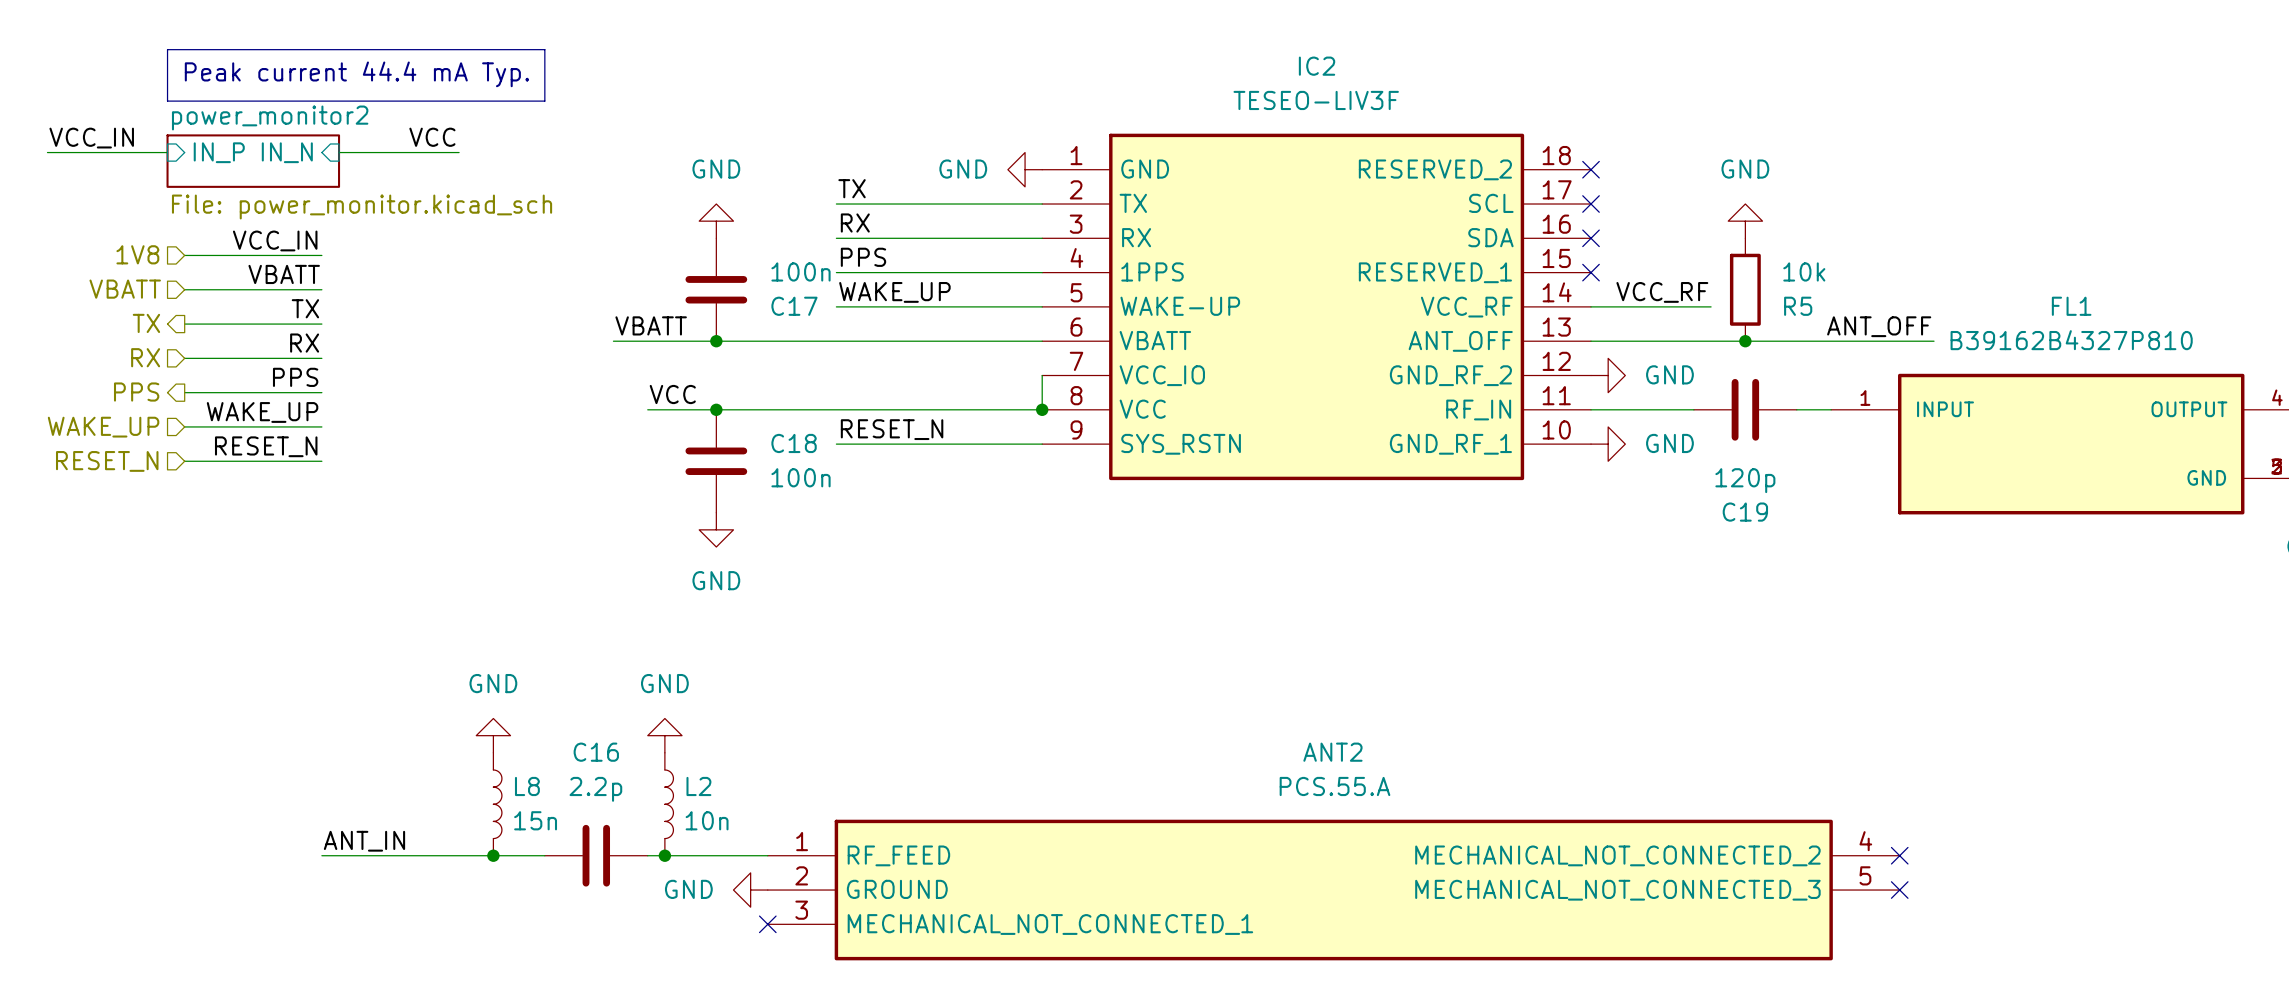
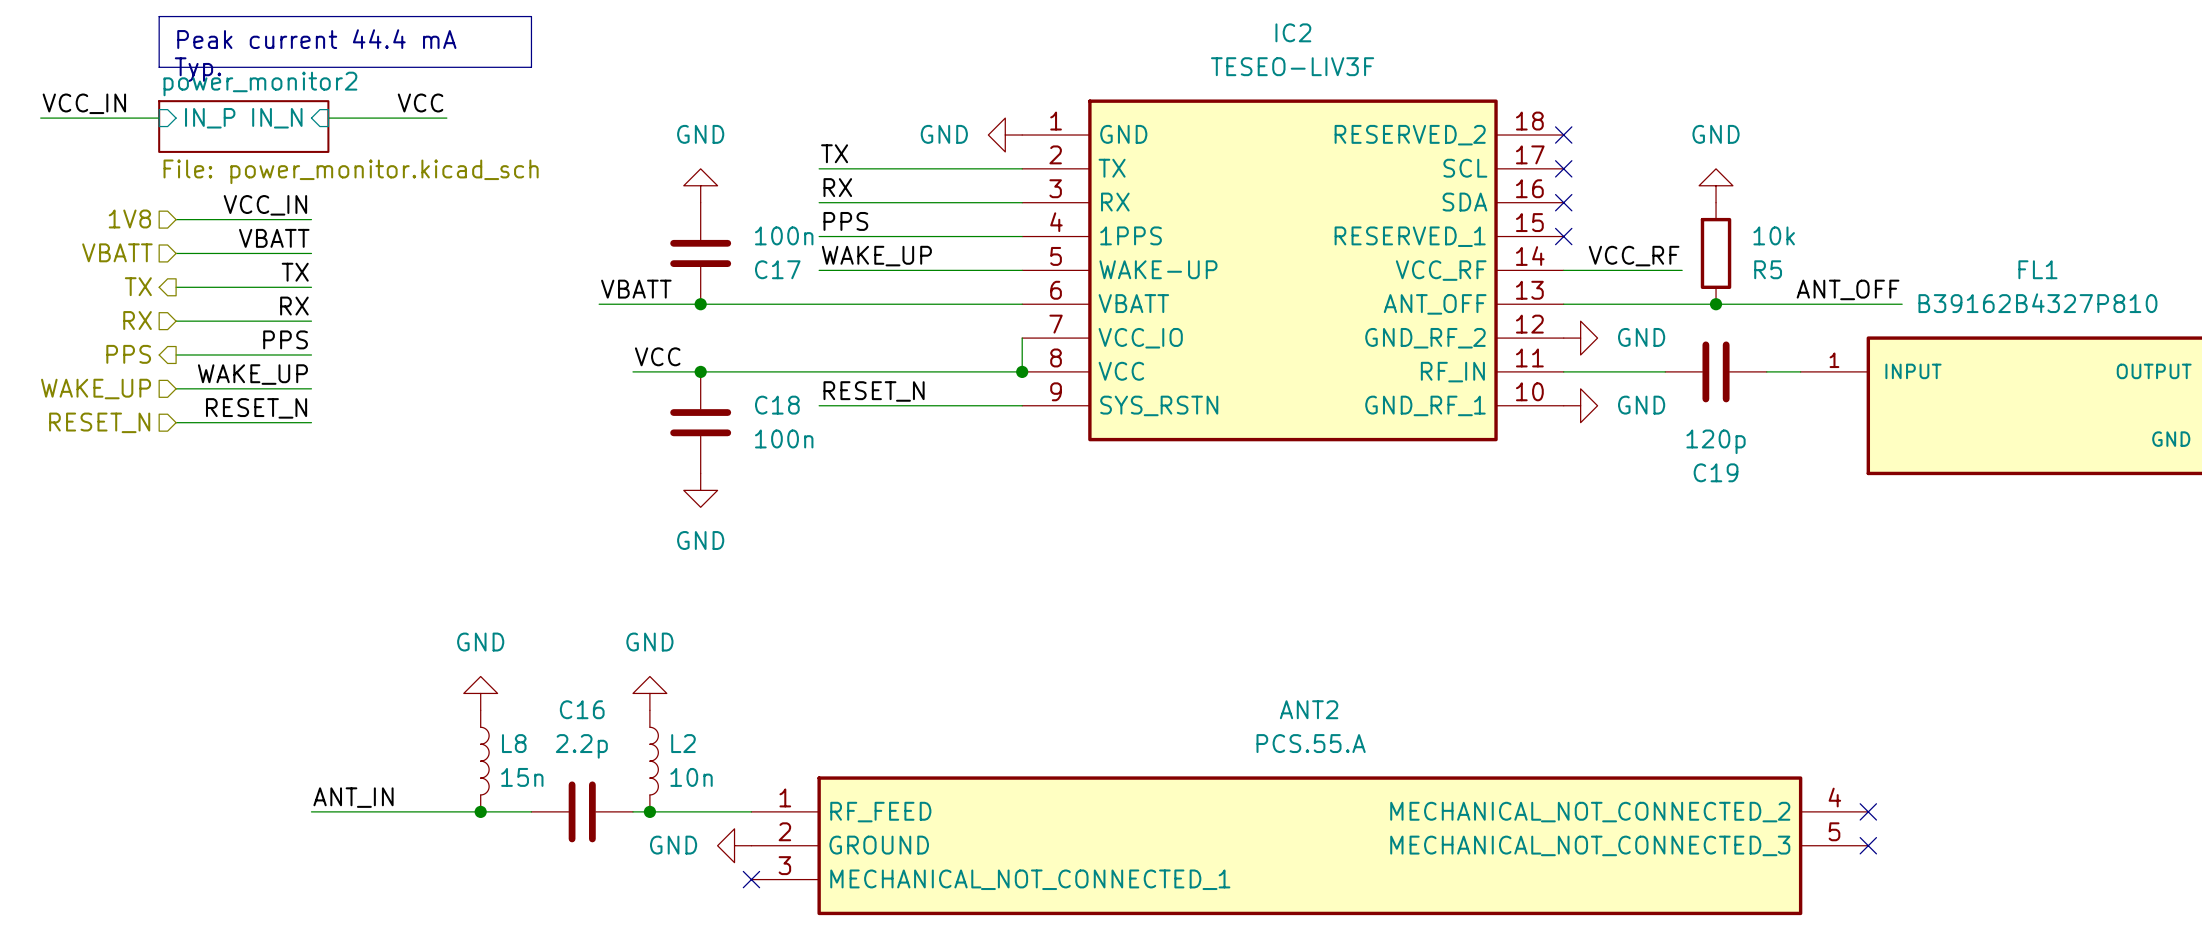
text: Peak current 44.4 mA Typ. (356, 74) -> Peak current 44.4 mA (316, 39)
text: none -> Typ. (197, 69)

